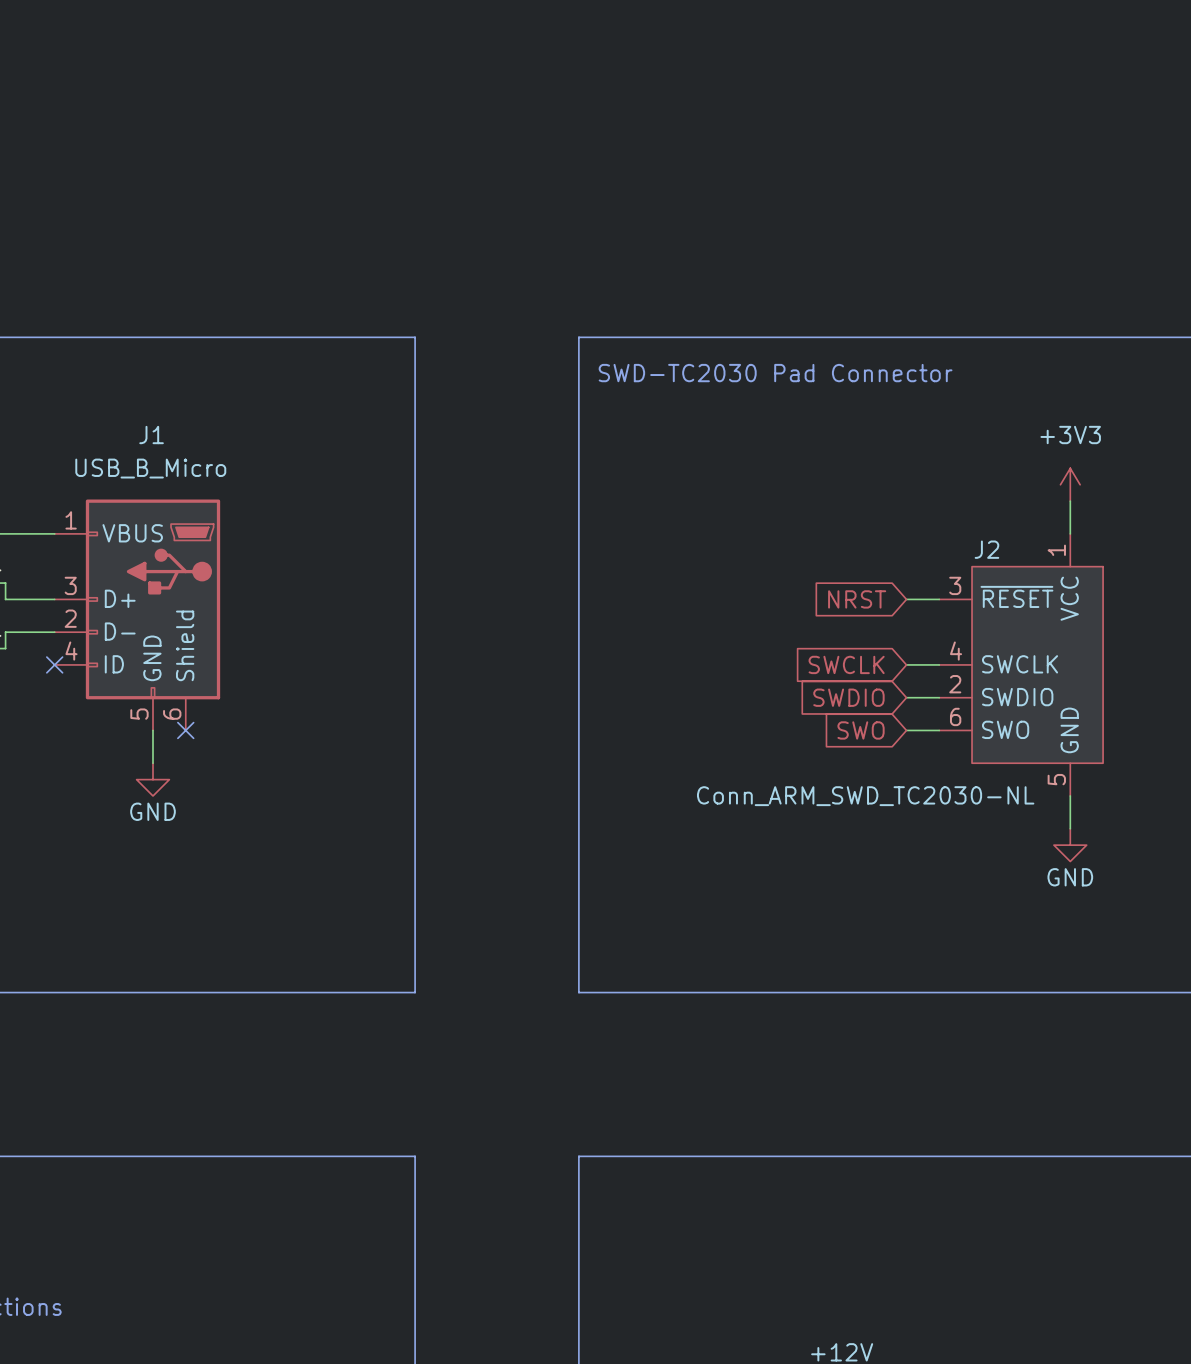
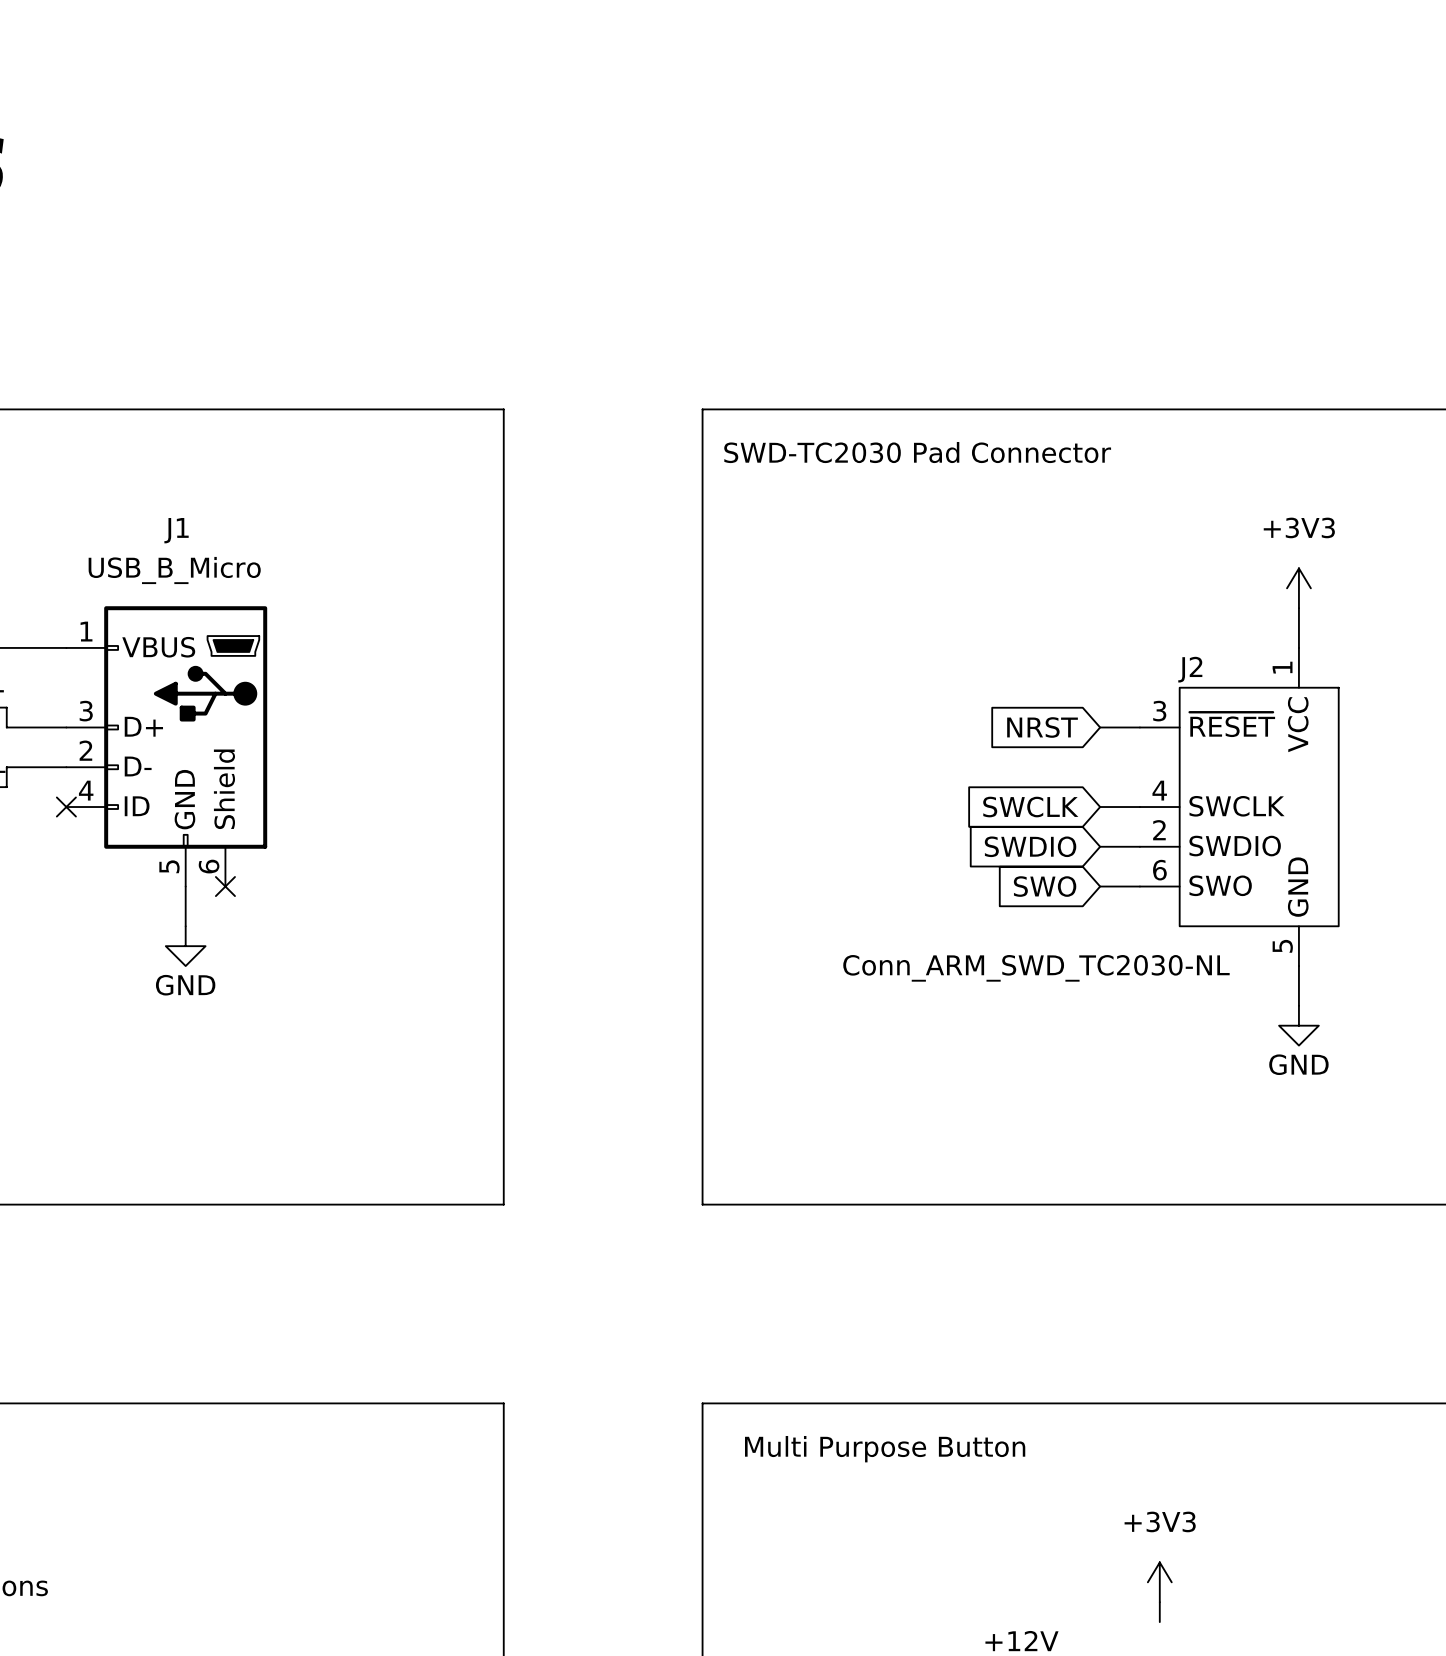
text: none -> Multi Purpose Button (885, 1449)
power symbol: none -> +3V3 (1159, 1582)
wire: none -> (1159, 1602) (1159, 1622)

